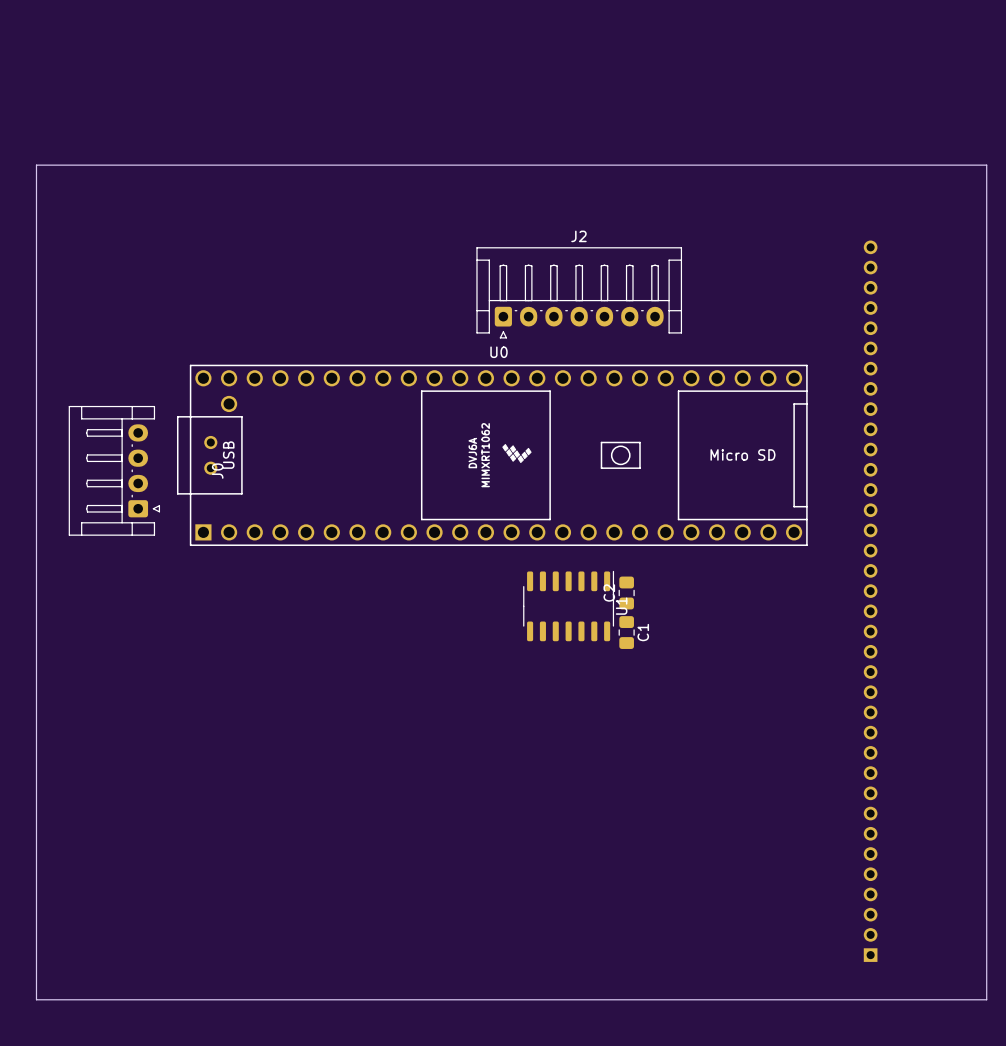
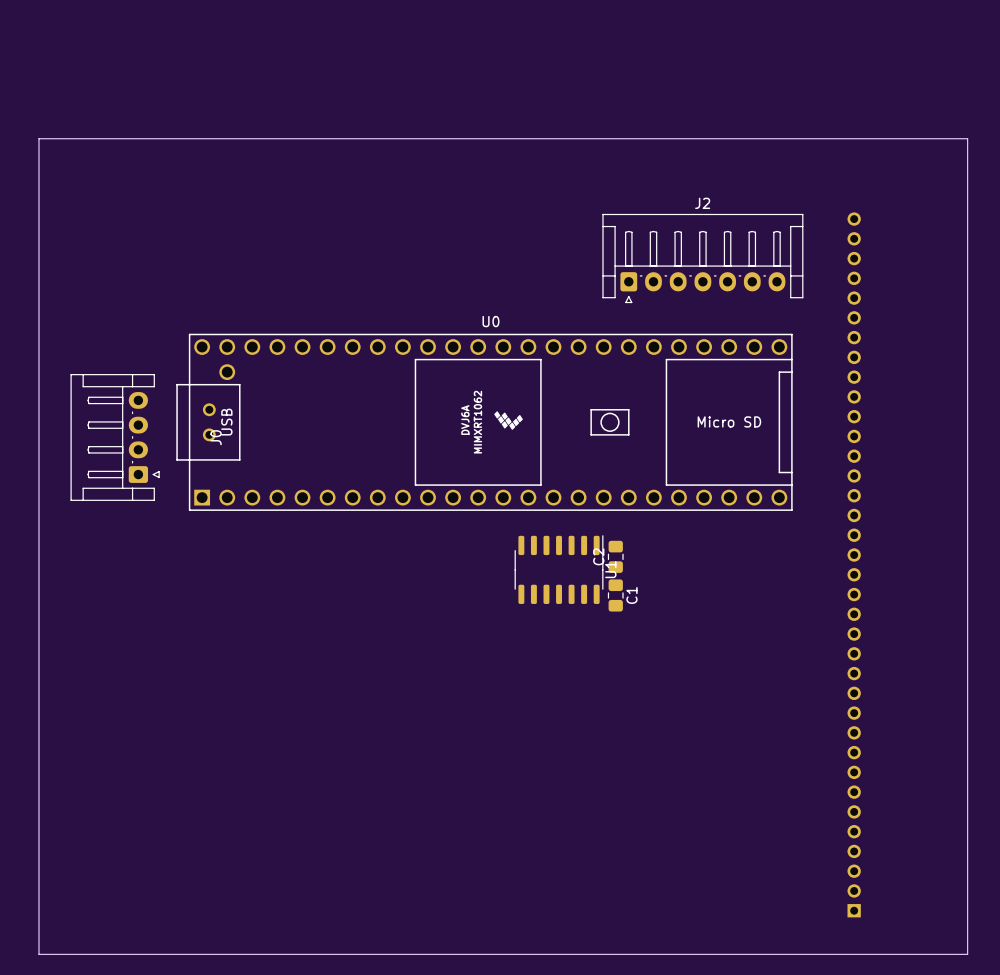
J2 position: (579, 292) -> (702, 258)

